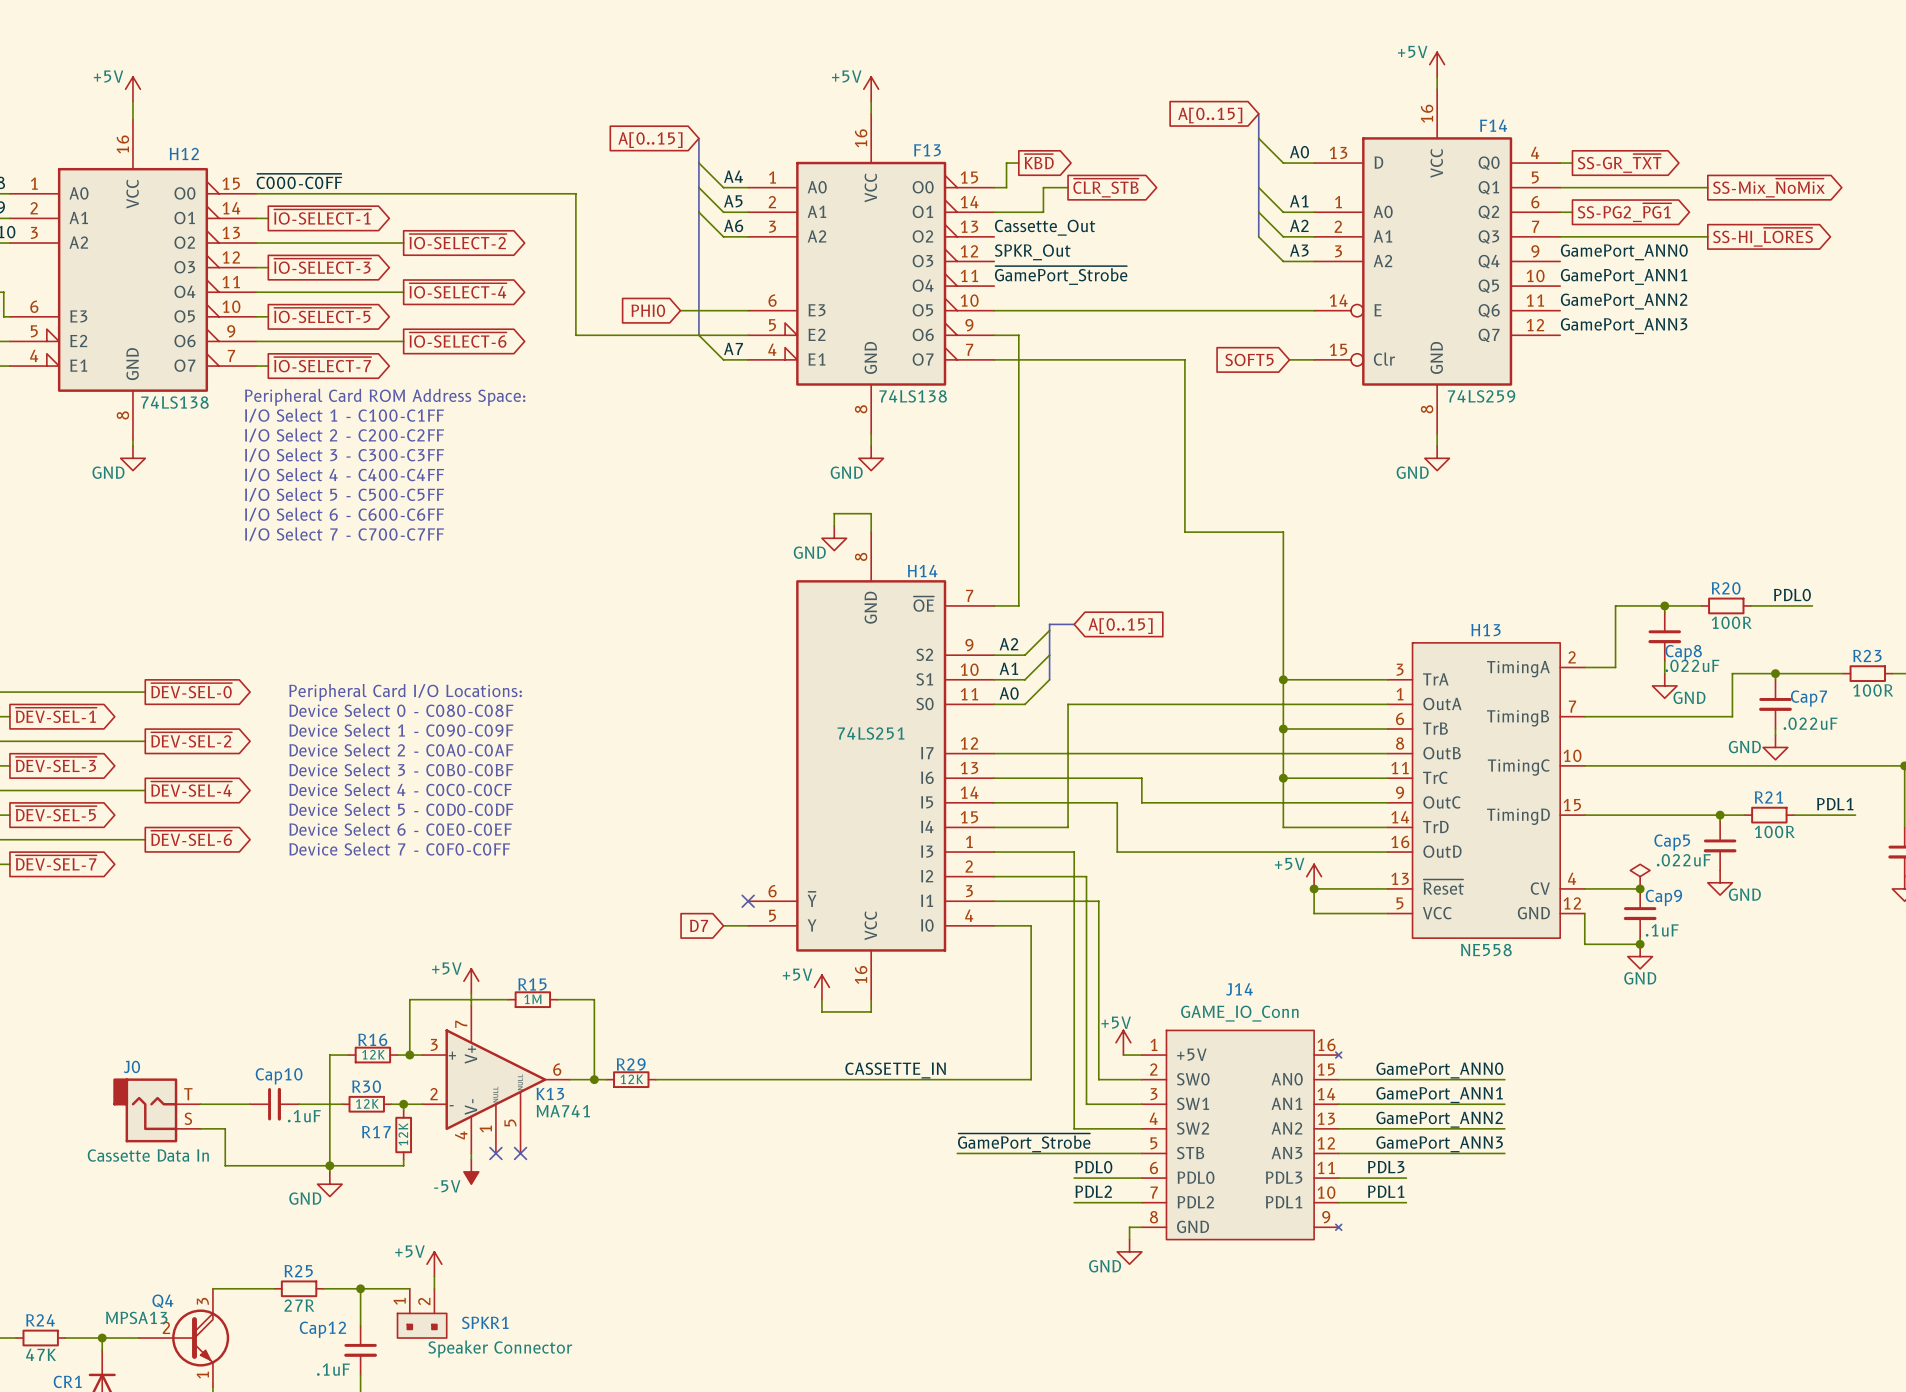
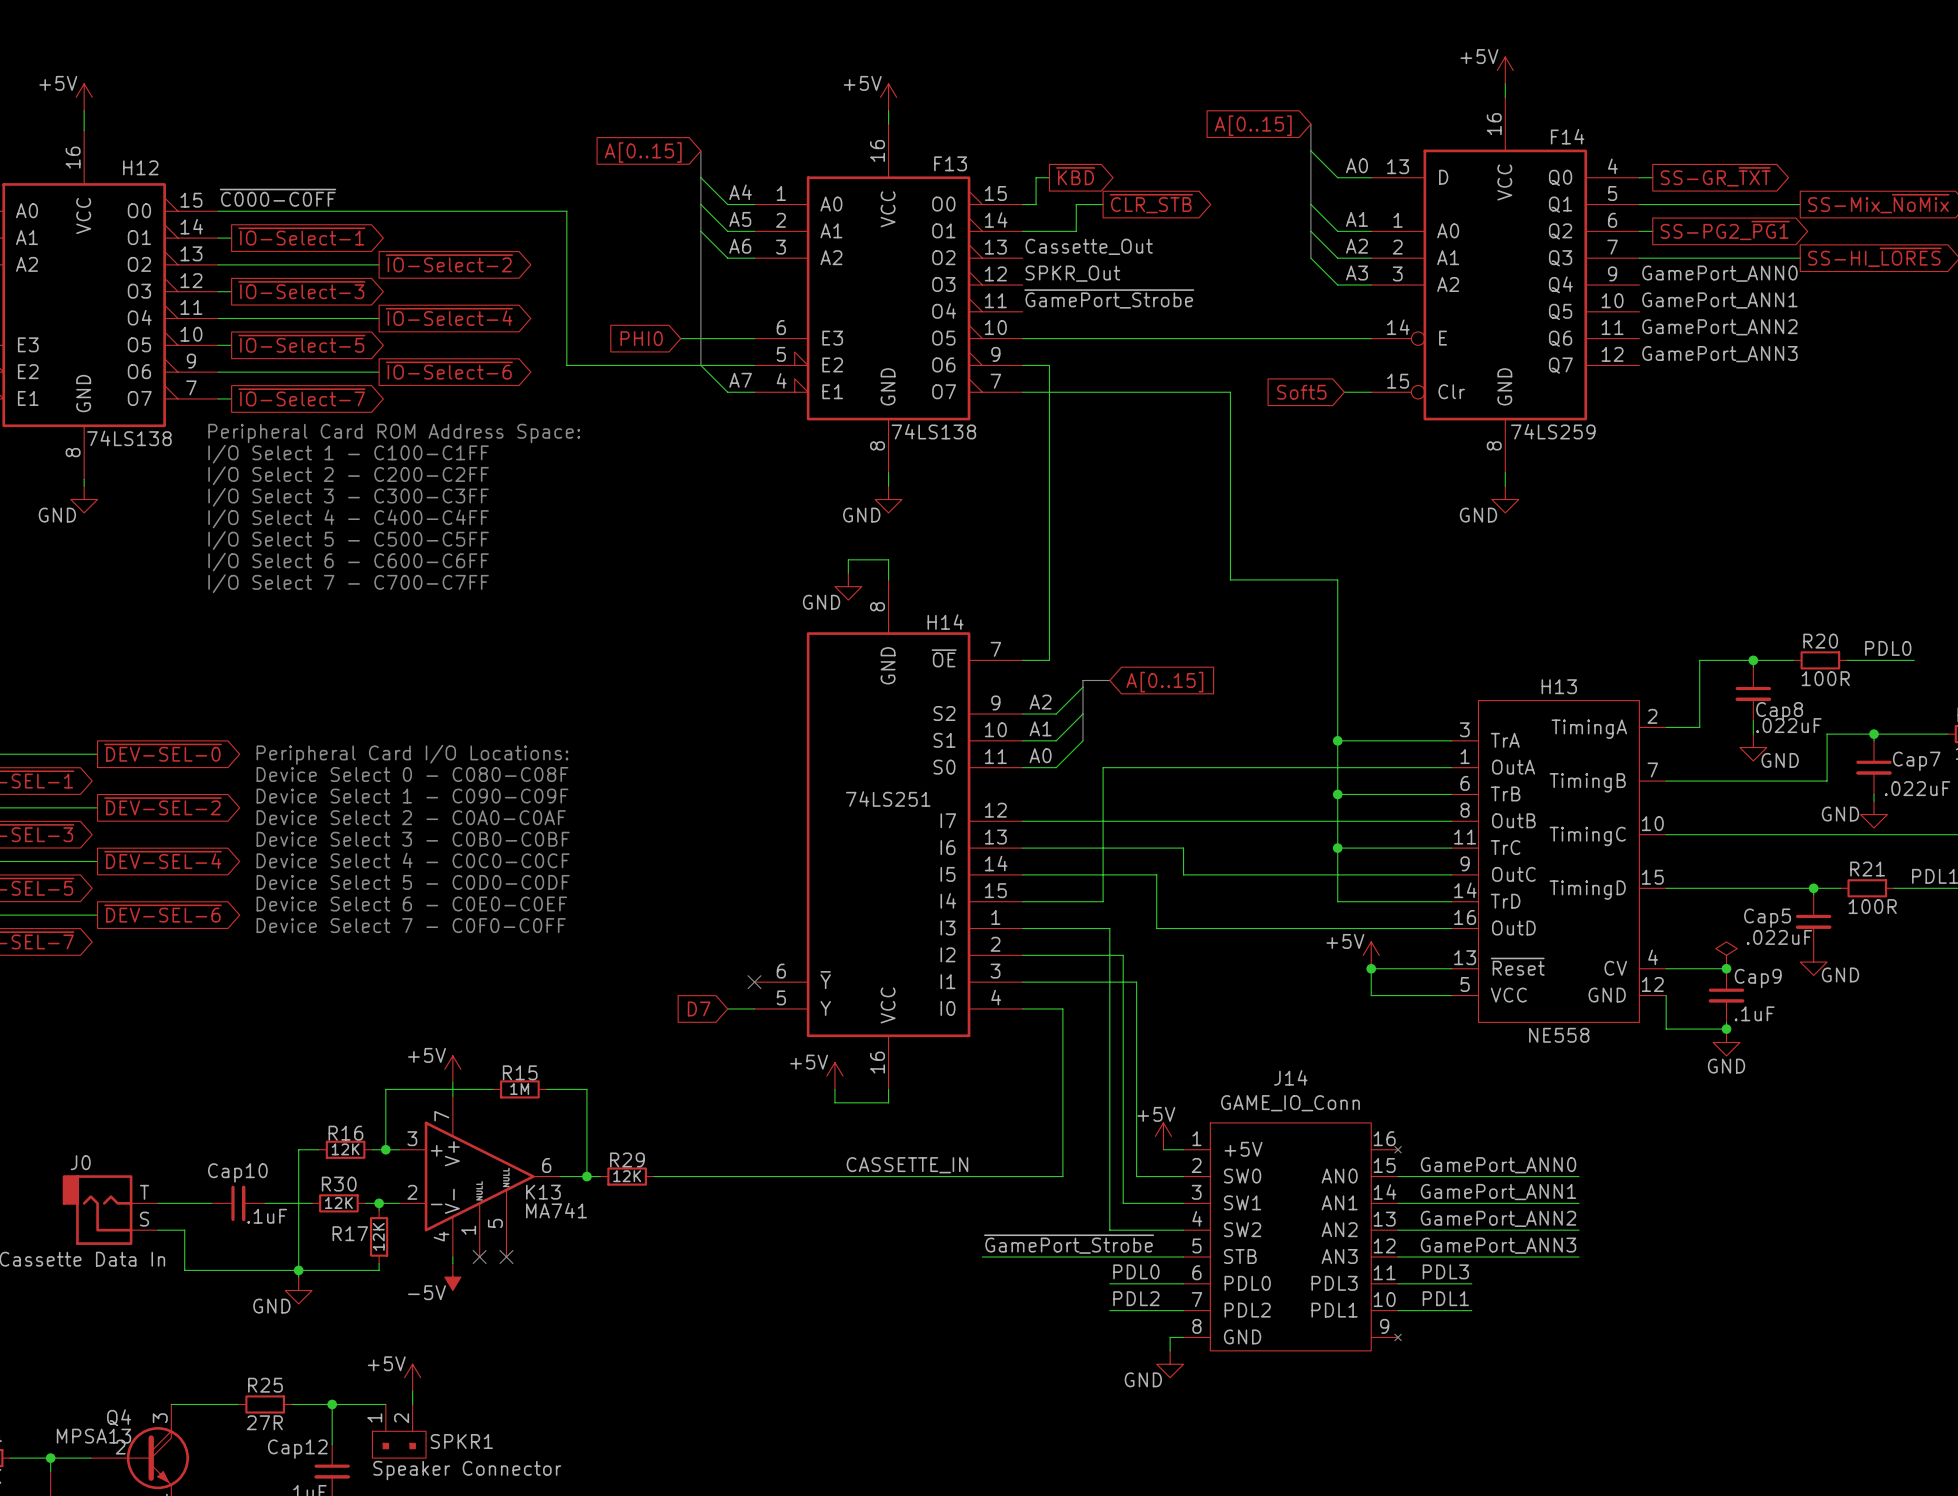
global label: ~{IO-SELECT-1} (322, 217) -> ~{IO-Select-1} (301, 236)
global label: ~{IO-SELECT-2} (458, 241) -> ~{IO-Select-2} (449, 263)
global label: ~{IO-SELECT-3} (322, 266) -> ~{IO-Select-3} (301, 290)
global label: ~{IO-SELECT-4} (458, 290) -> ~{IO-Select-4} (449, 316)
global label: ~{IO-SELECT-5} (322, 315) -> ~{IO-Select-5} (301, 343)
global label: ~{IO-SELECT-6} (458, 340) -> ~{IO-Select-6} (449, 370)
global label: SOFT5 (1249, 359) -> Soft5 (1301, 392)
global label: ~{IO-SELECT-7} (322, 364) -> ~{IO-Select-7} (301, 397)

